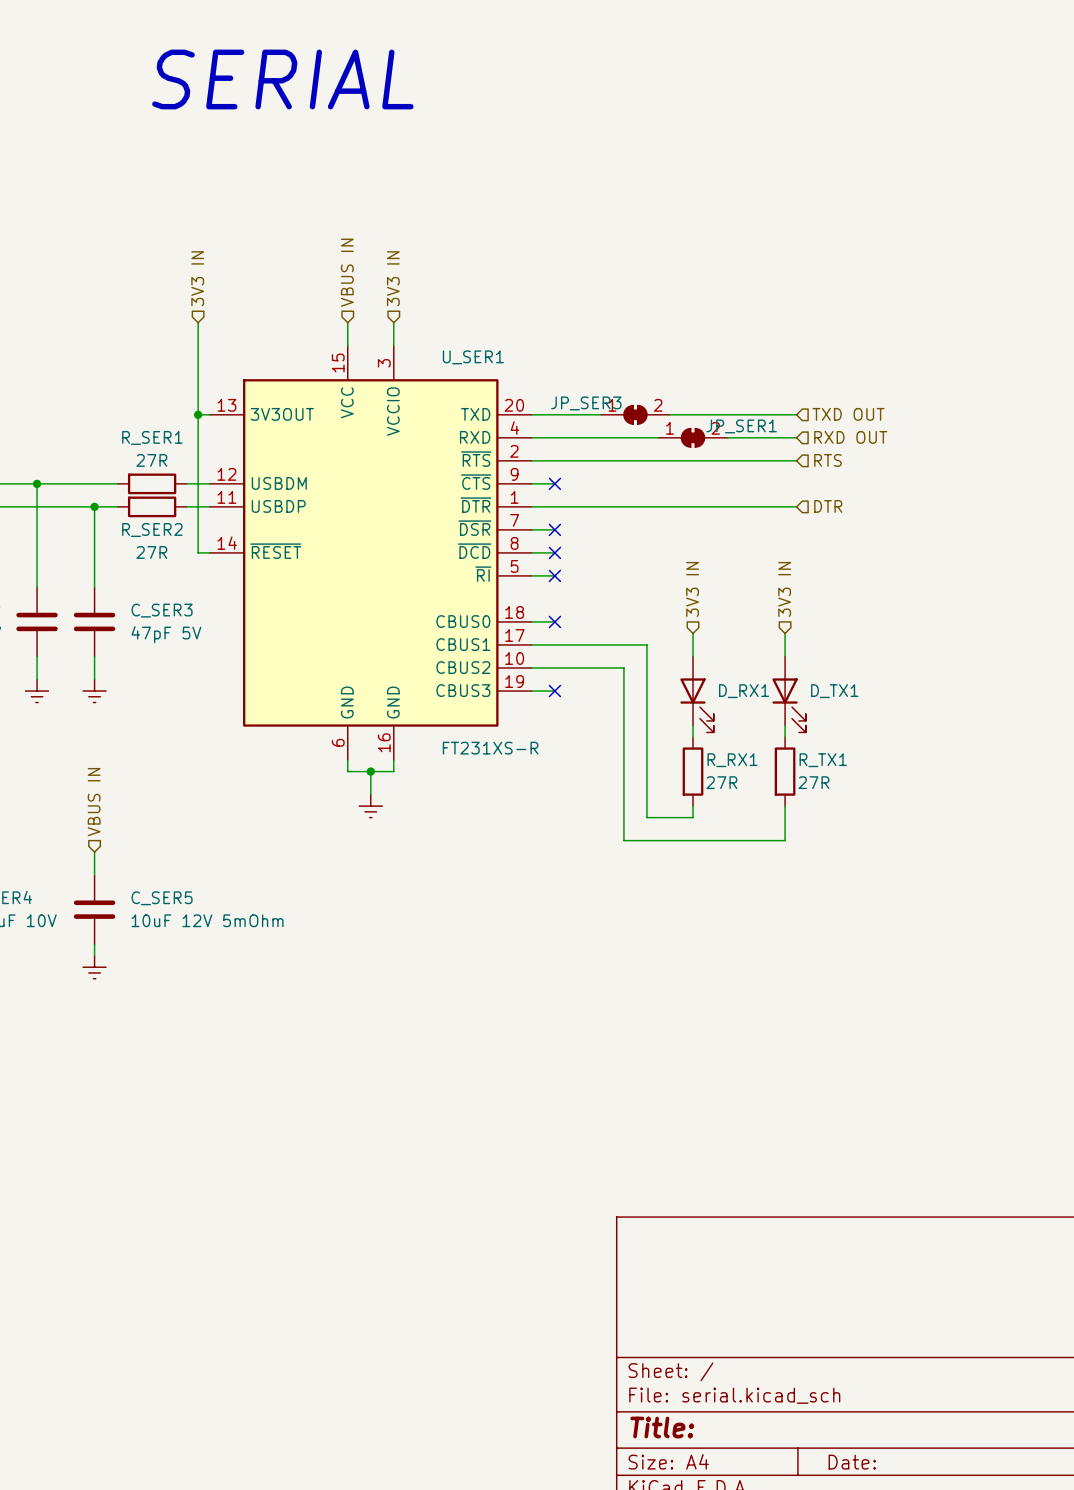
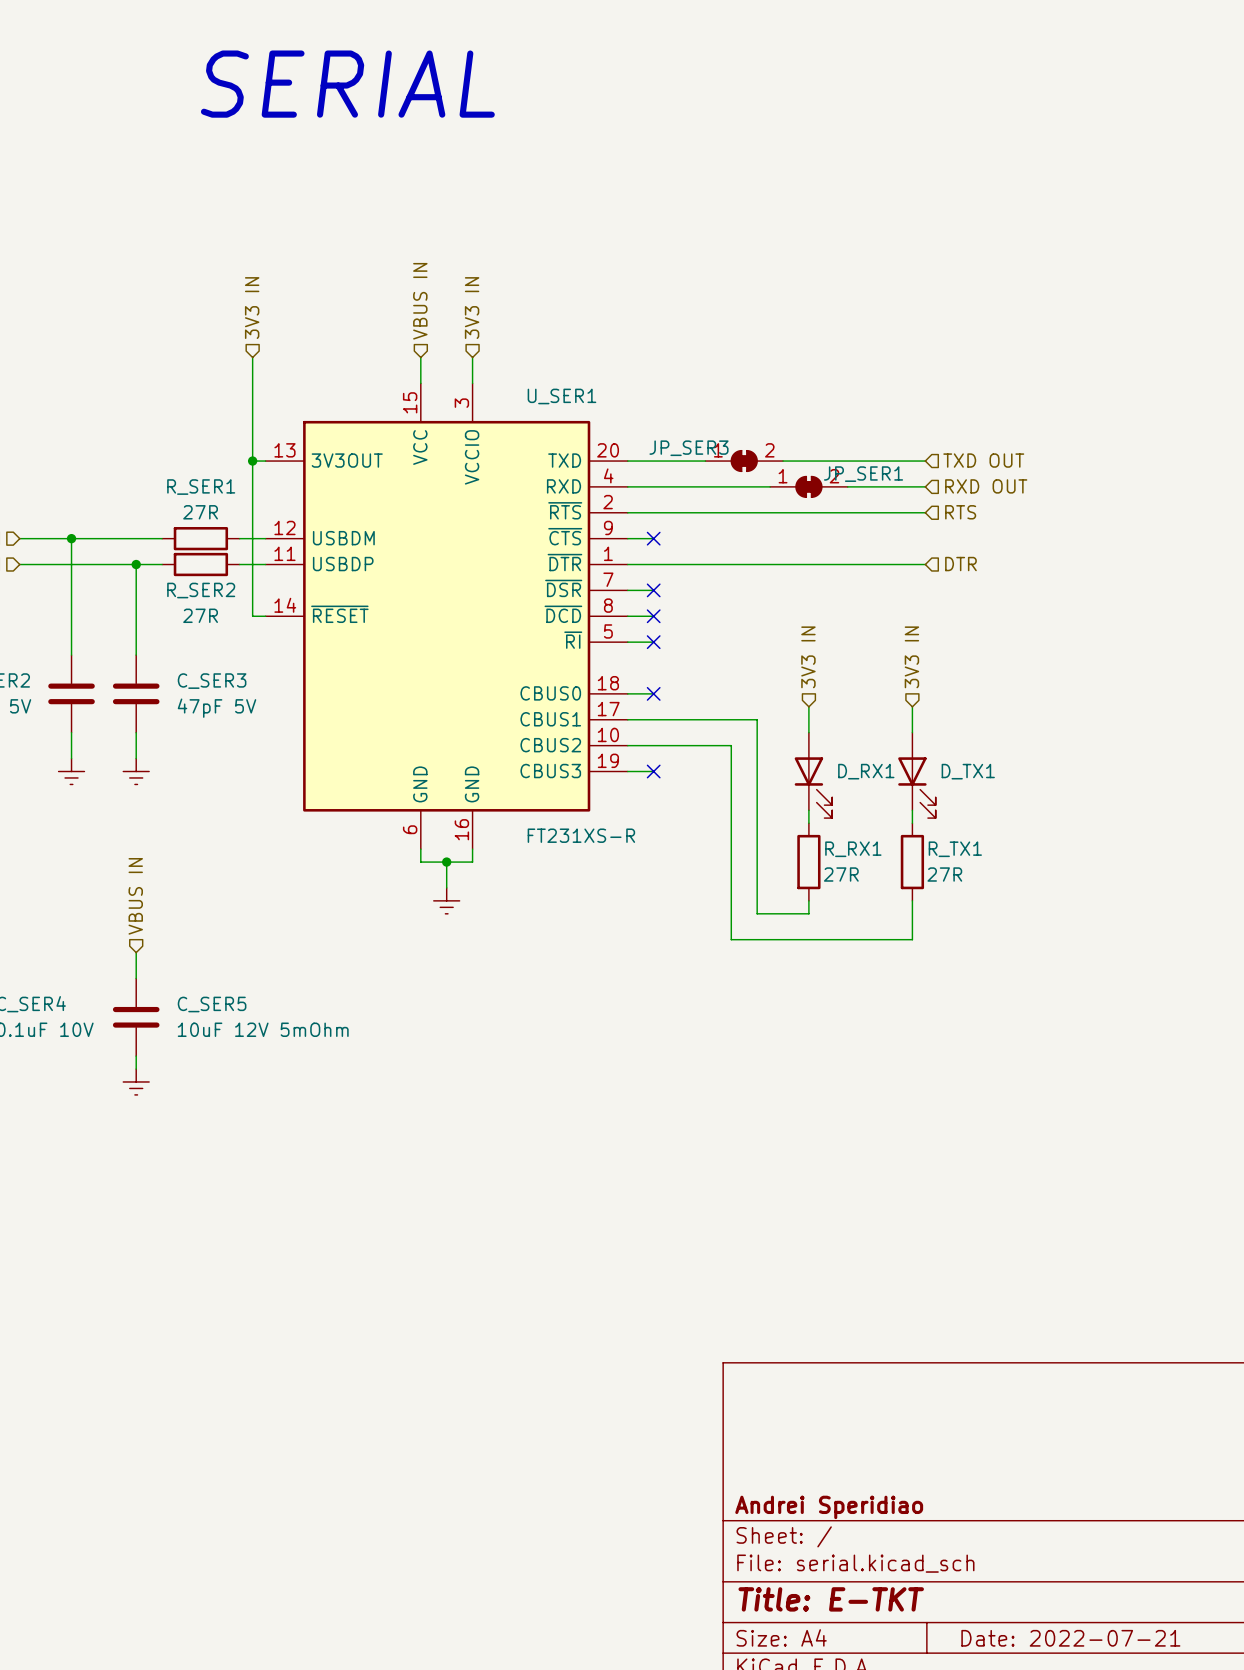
title block: none -> Andrei Speridiao (829, 1507)
title block: Title: (662, 1427) -> Title: E-TKT (831, 1599)
title block: Date: (852, 1462) -> Date: 2022-07-21 (1070, 1638)

